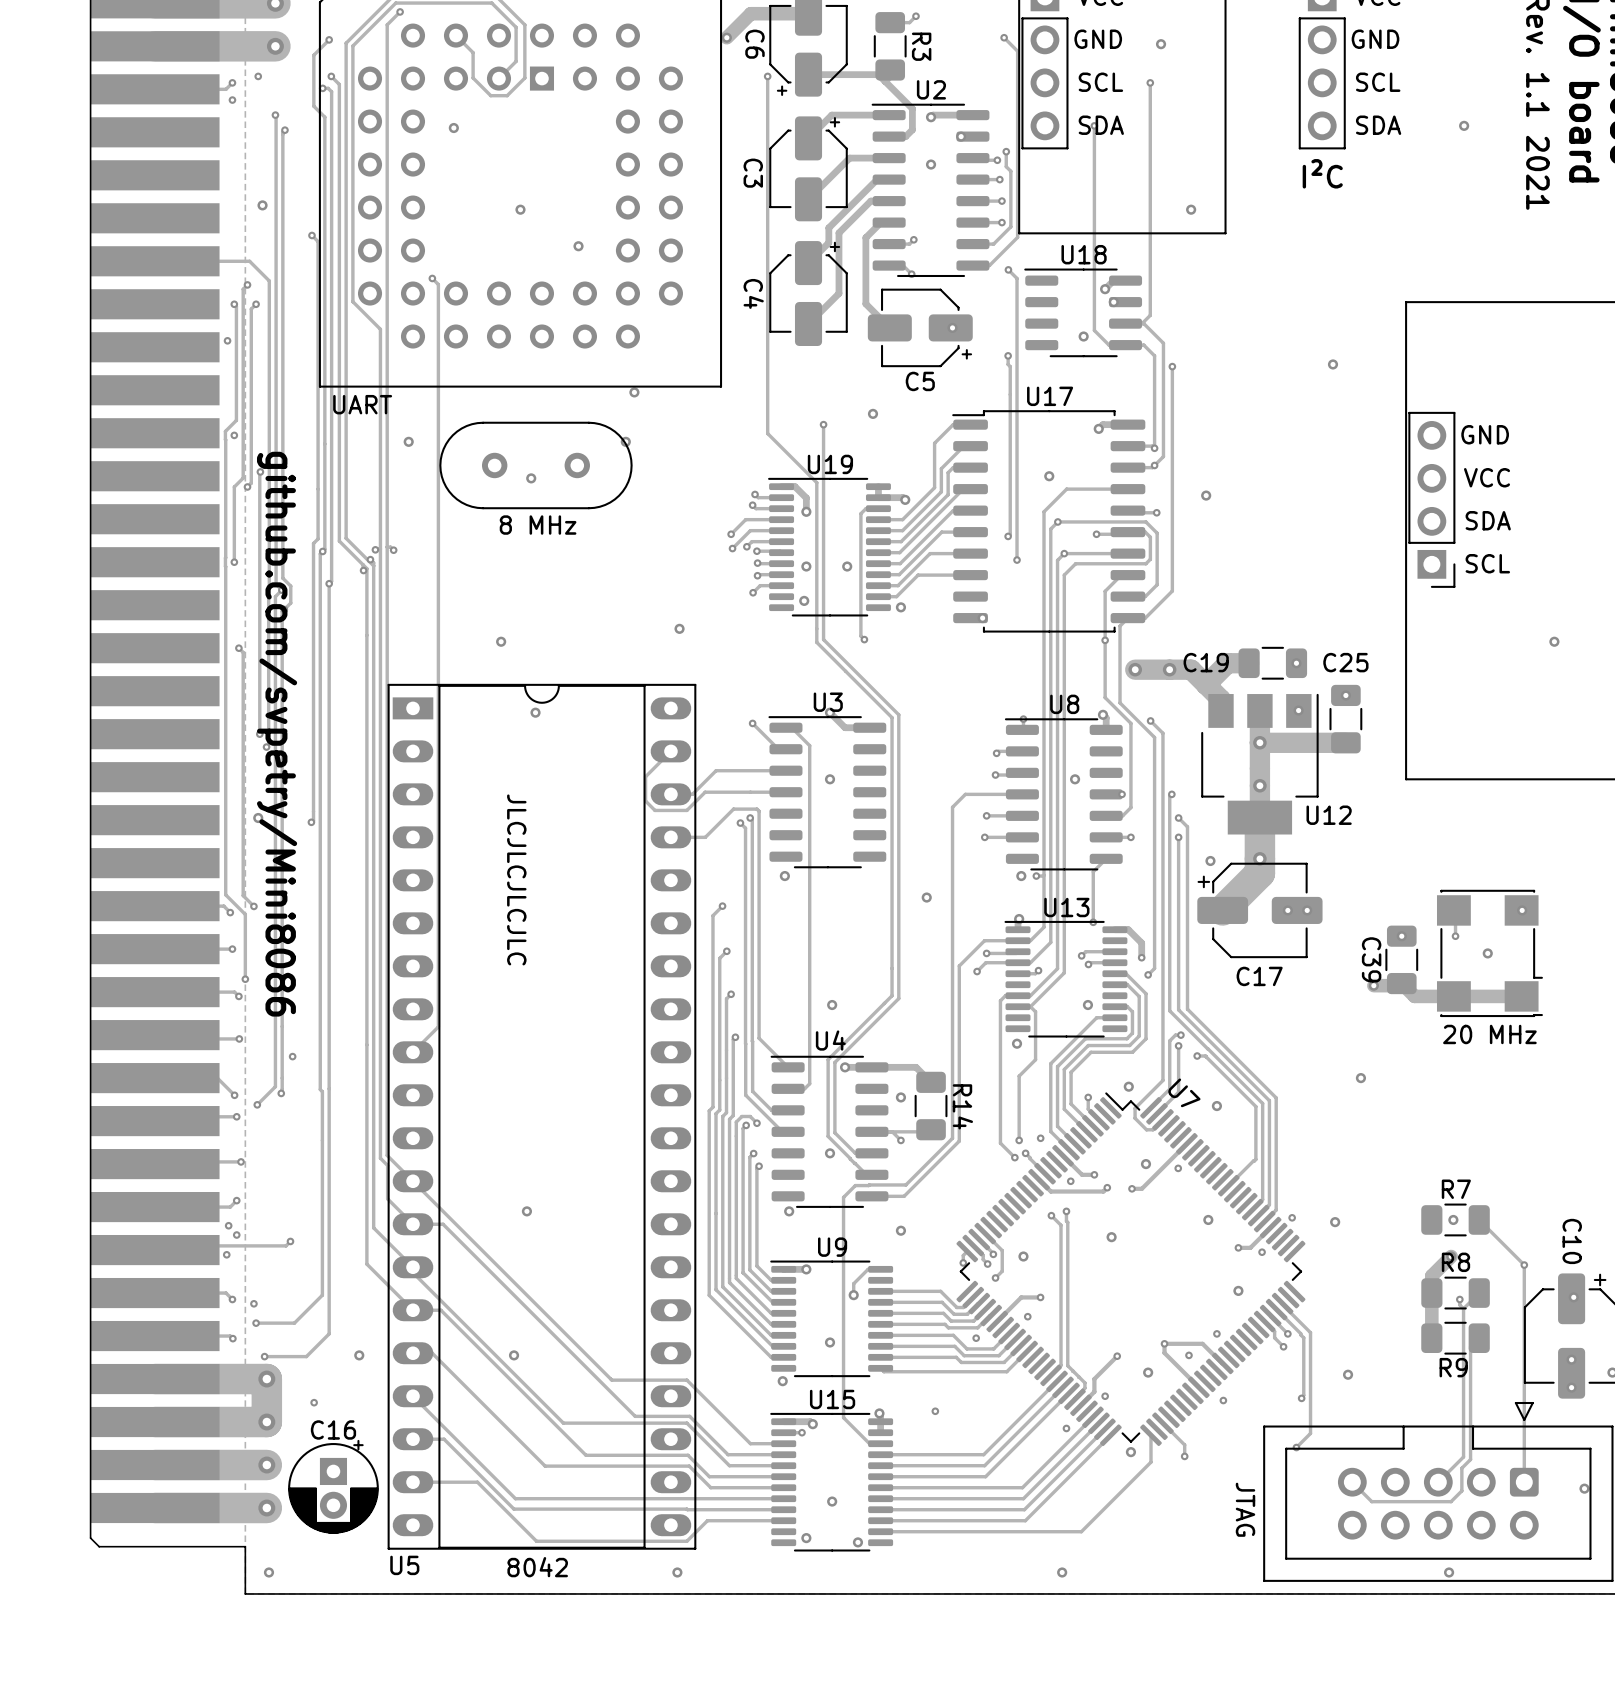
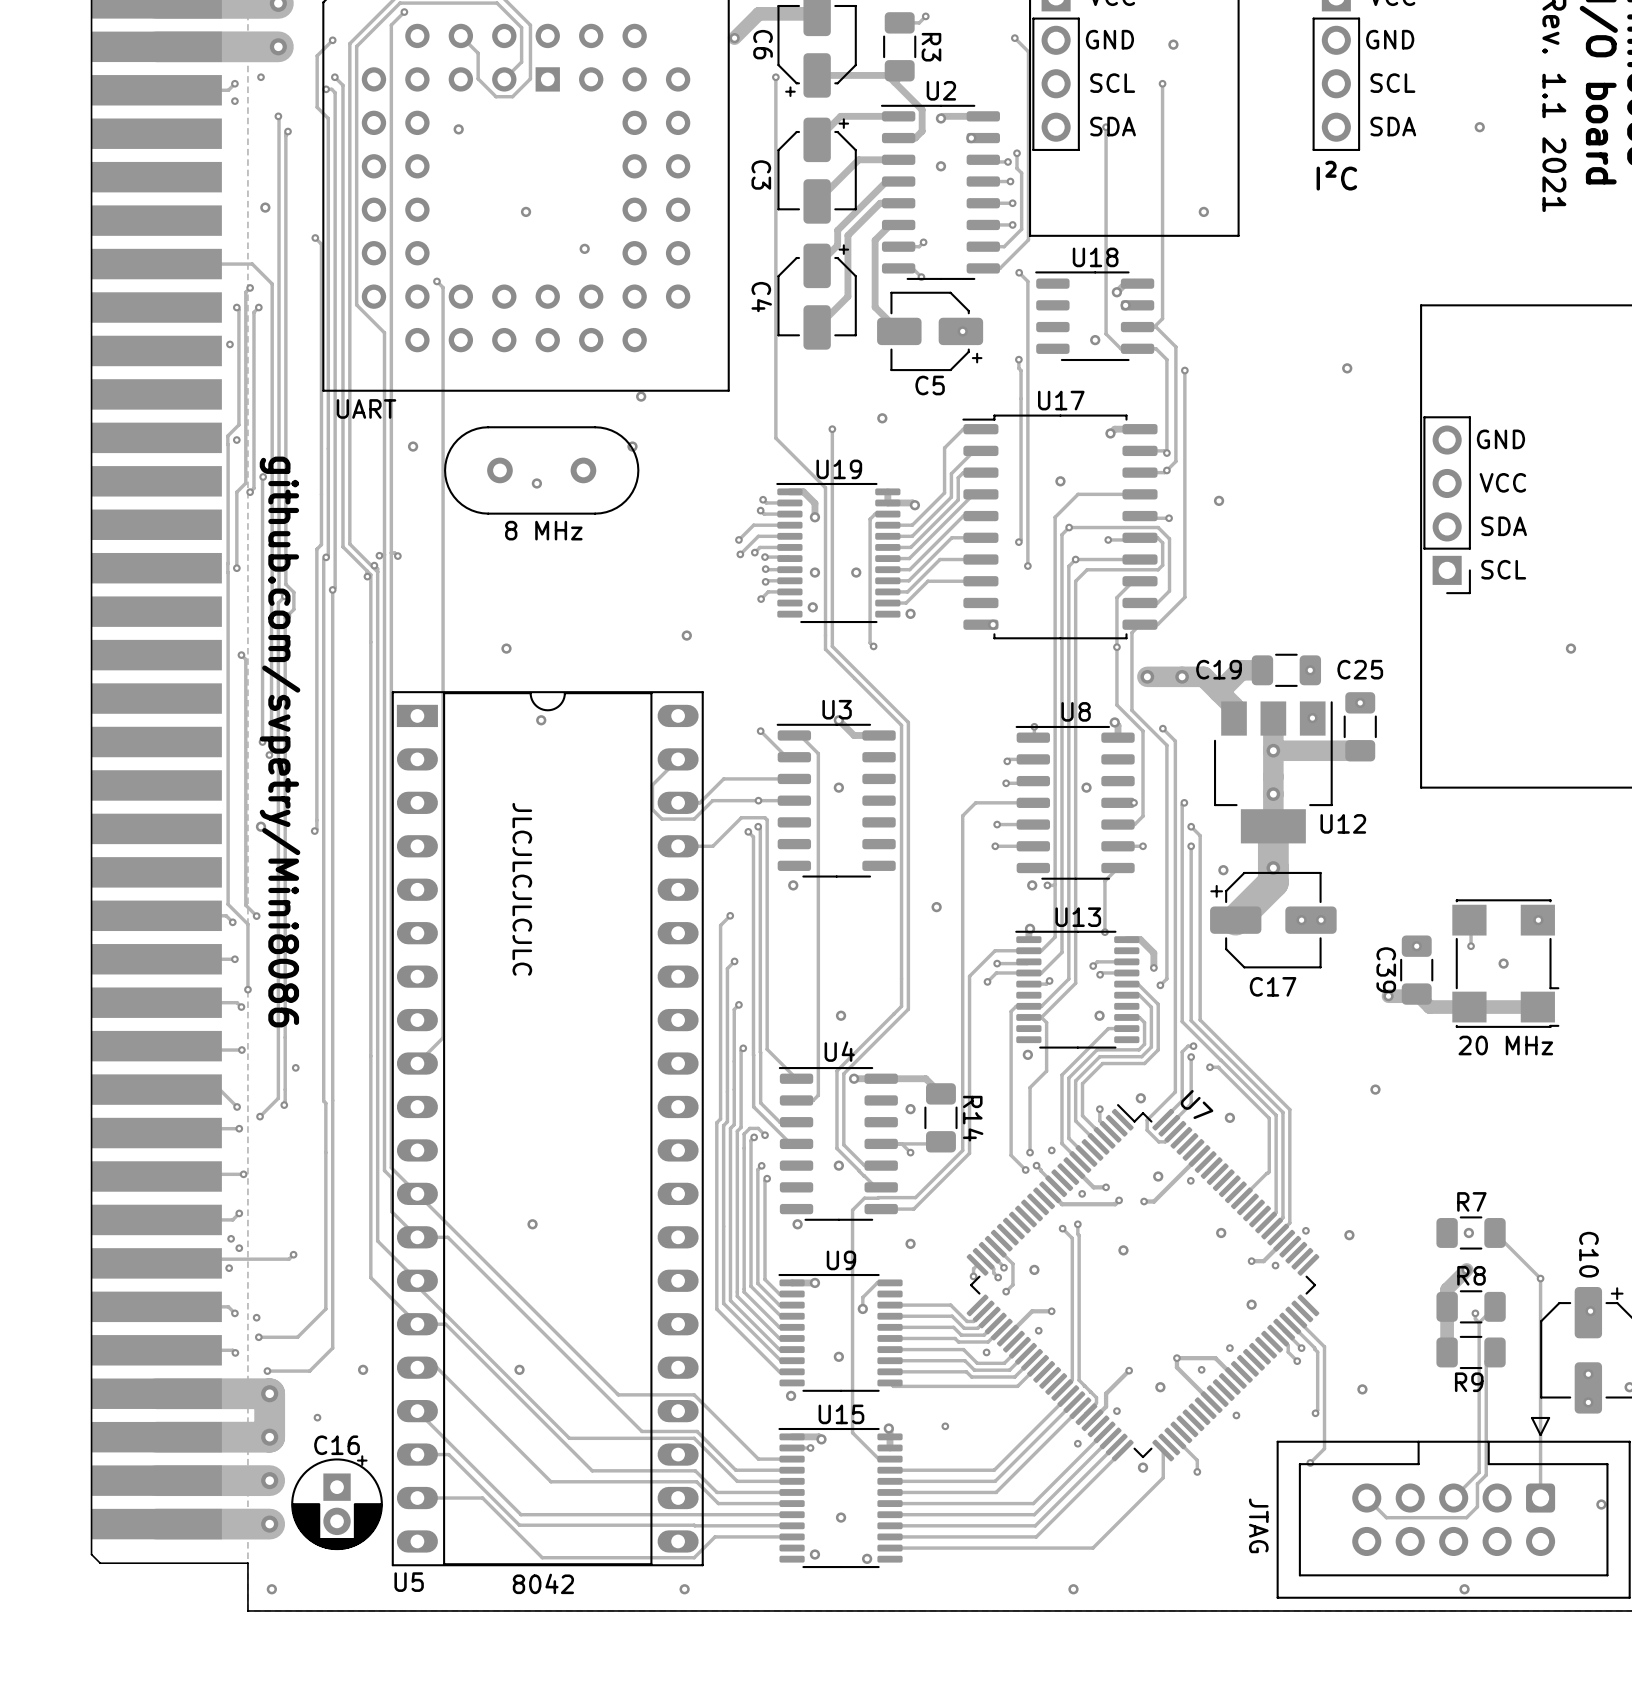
via: none -> (758, 800)

